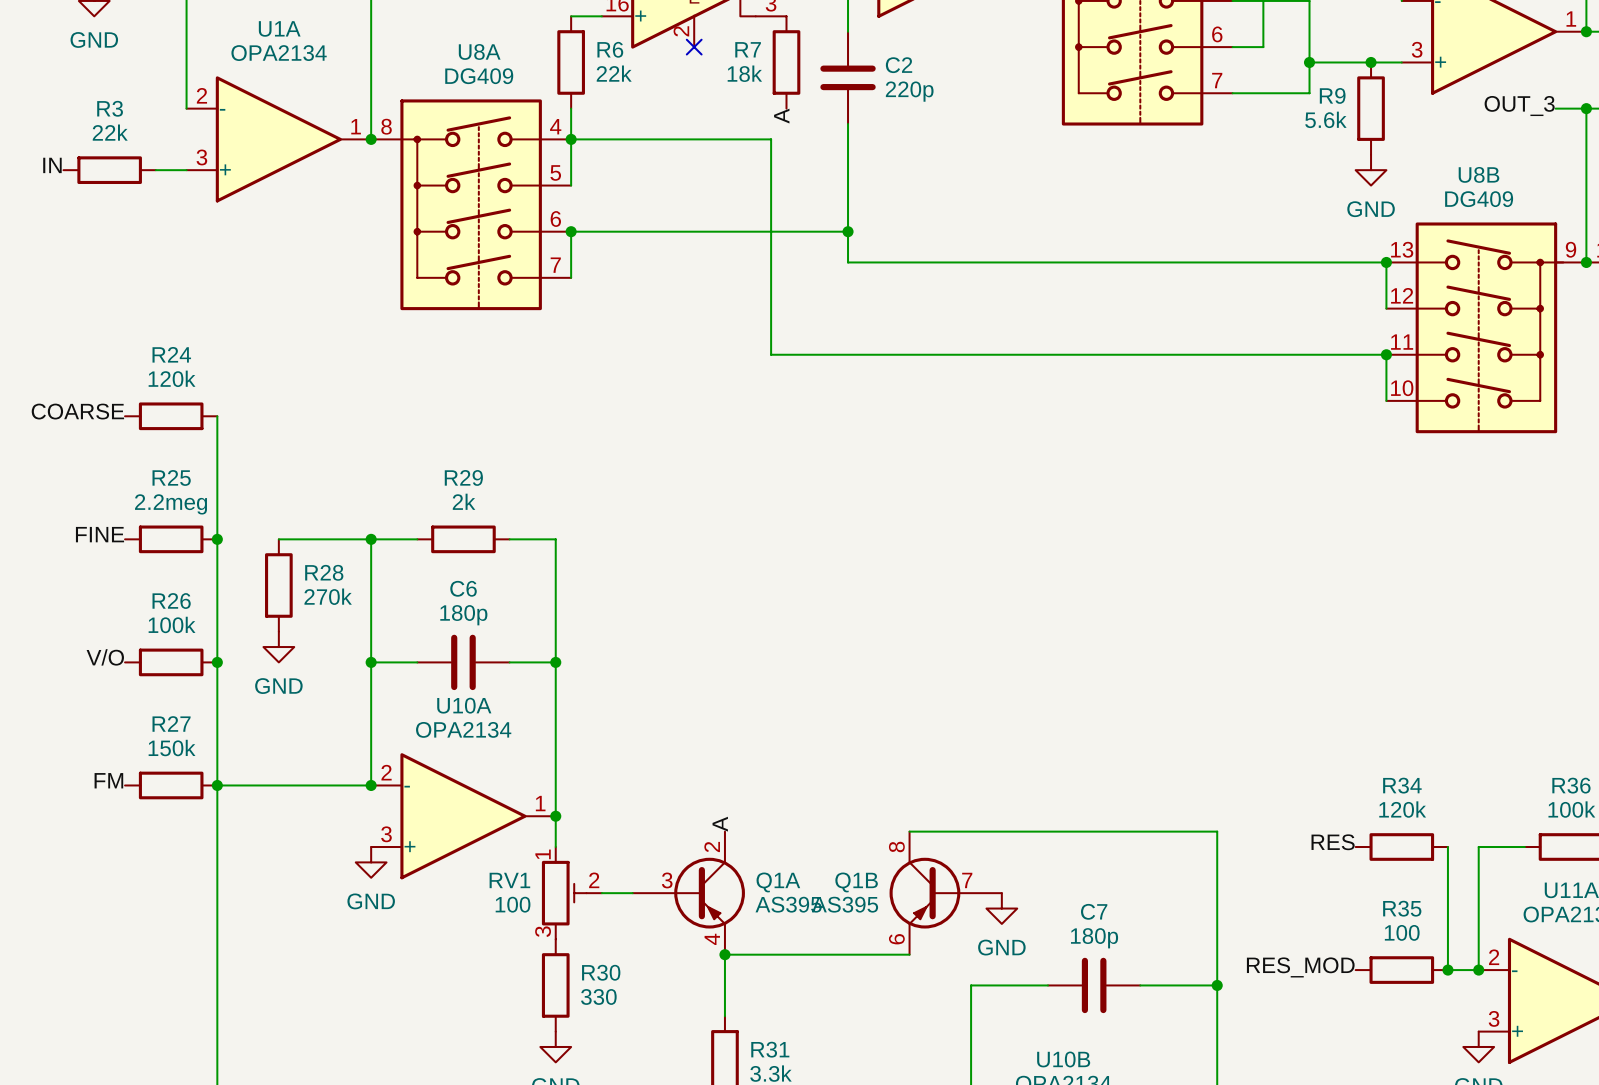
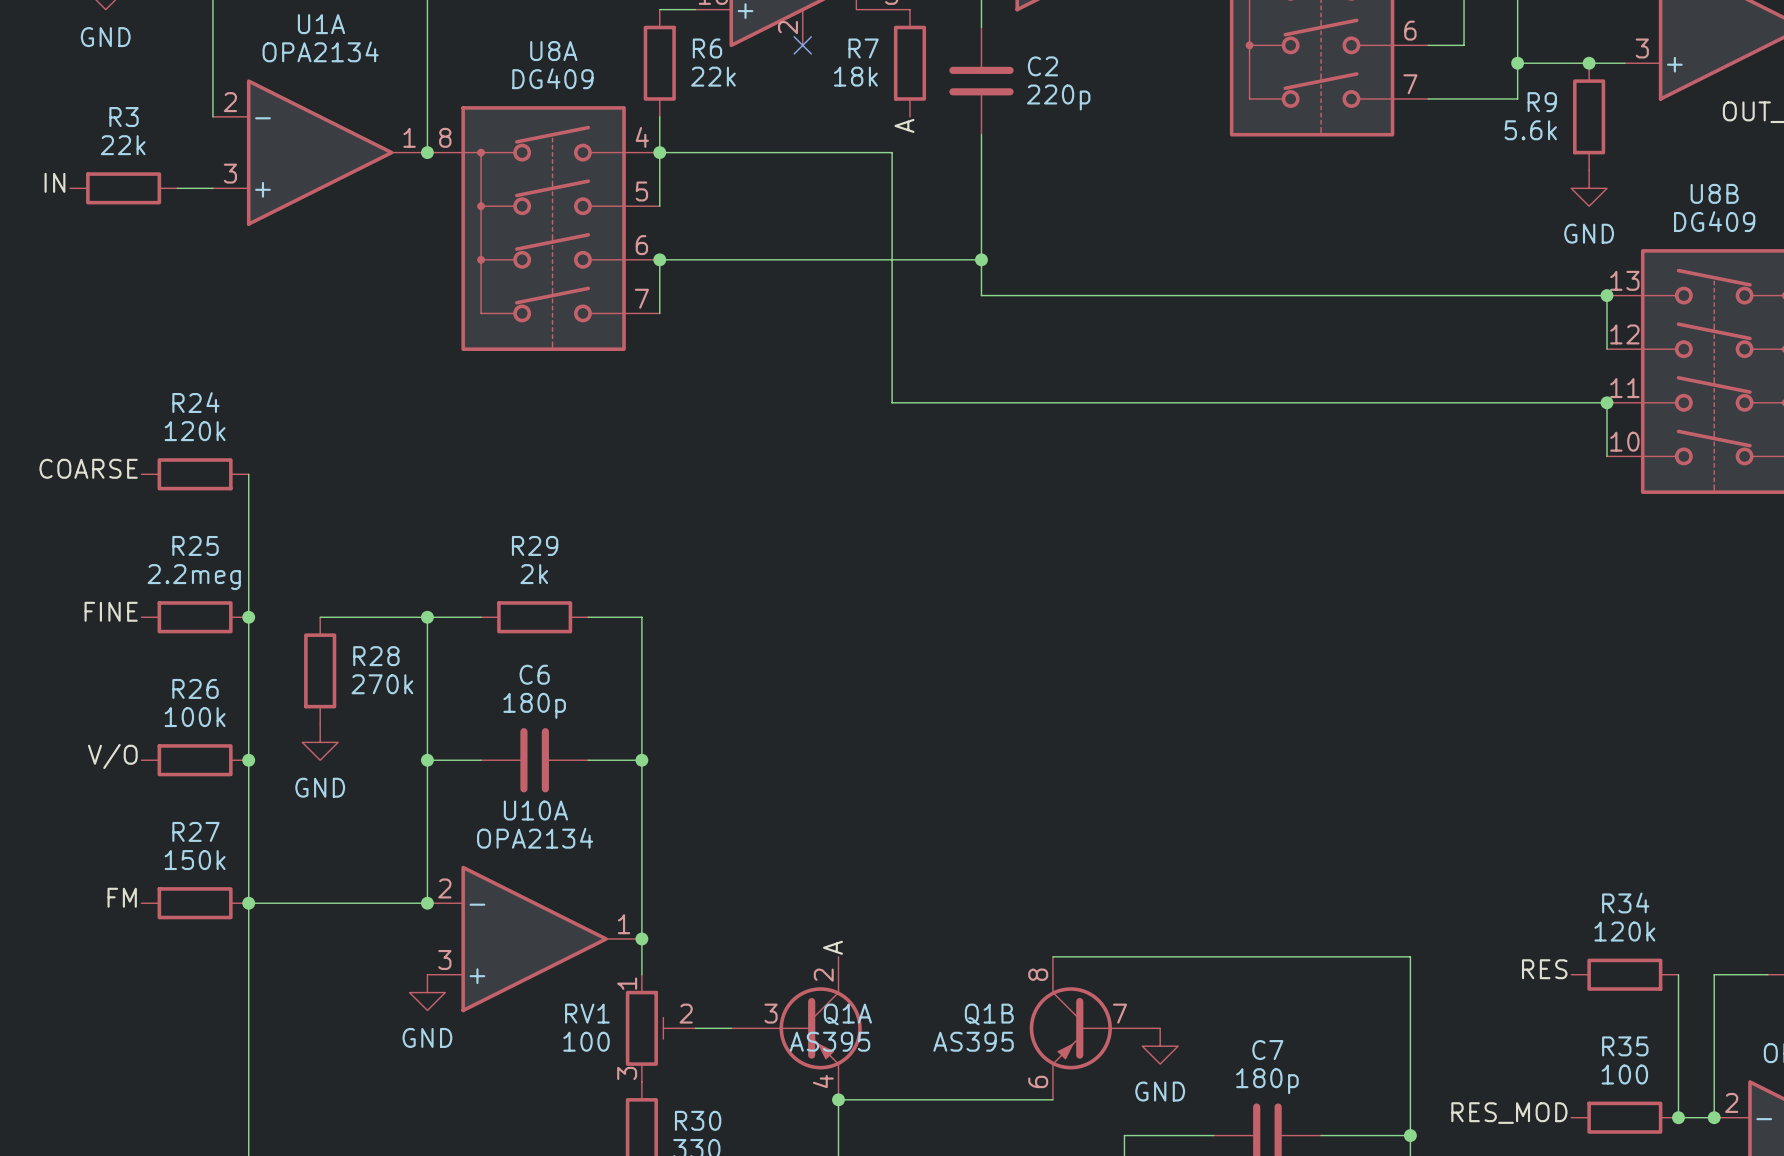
Q1A name position: Q1A (778, 882) -> Q1A (847, 1014)
Q1A value position: AS395 (788, 904) -> AS395 (829, 1041)

